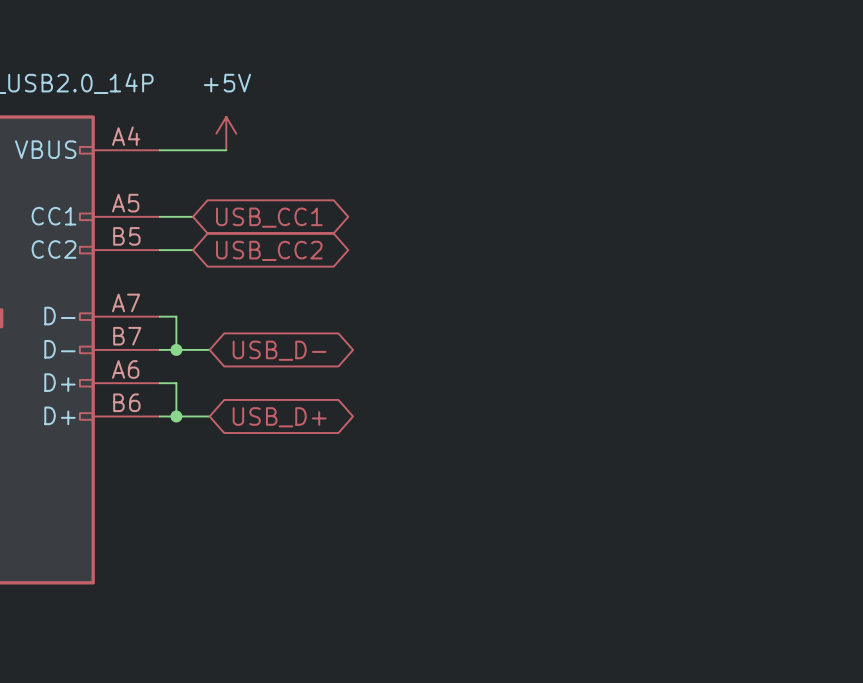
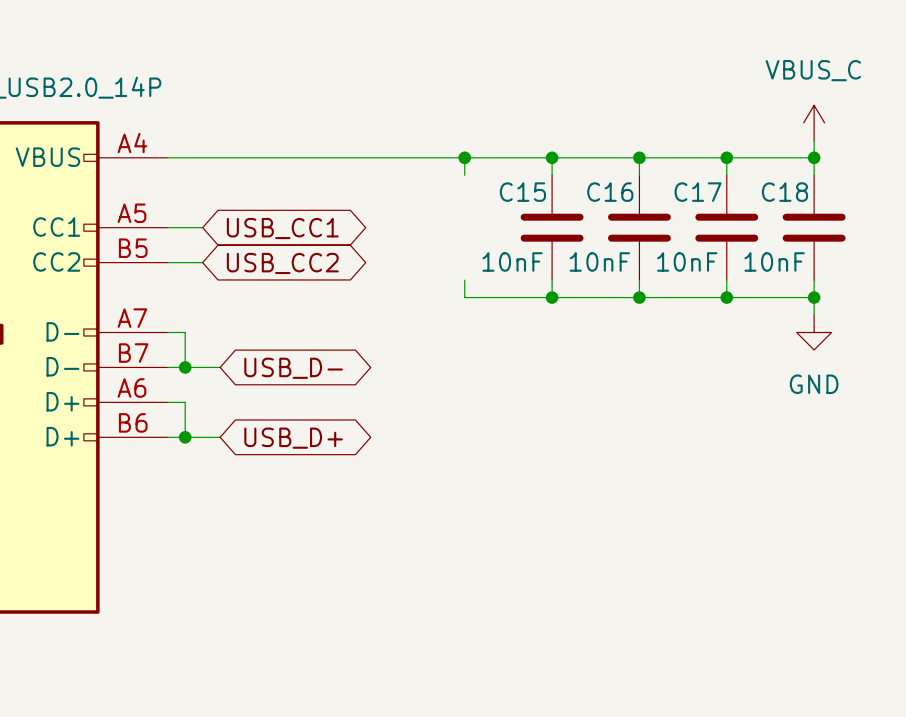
power symbol: none -> VBUS_C (814, 122)
power symbol: +5V (226, 133) -> none
wire: none -> (814, 140) (814, 175)
wire: none -> (237, 157) (814, 157)
wire: none -> (464, 157) (464, 175)
junction: none -> (464, 157)
wire: none -> (552, 157) (552, 175)
junction: none -> (552, 157)
wire: none -> (639, 157) (639, 175)
junction: none -> (639, 157)
wire: none -> (726, 157) (726, 175)
junction: none -> (726, 157)
junction: none -> (814, 157)
C15: none -> 10nF (552, 227)
C16: none -> 10nF (639, 227)
C17: none -> 10nF (726, 227)
C18: none -> 10nF (814, 227)
wire: none -> (464, 280) (464, 297) (814, 297)
wire: none -> (552, 280) (552, 297)
wire: none -> (639, 280) (639, 297)
wire: none -> (726, 280) (726, 297)
wire: none -> (814, 280) (814, 315)
junction: none -> (552, 297)
junction: none -> (639, 297)
junction: none -> (726, 297)
junction: none -> (814, 297)
power symbol: none -> GND (814, 332)

